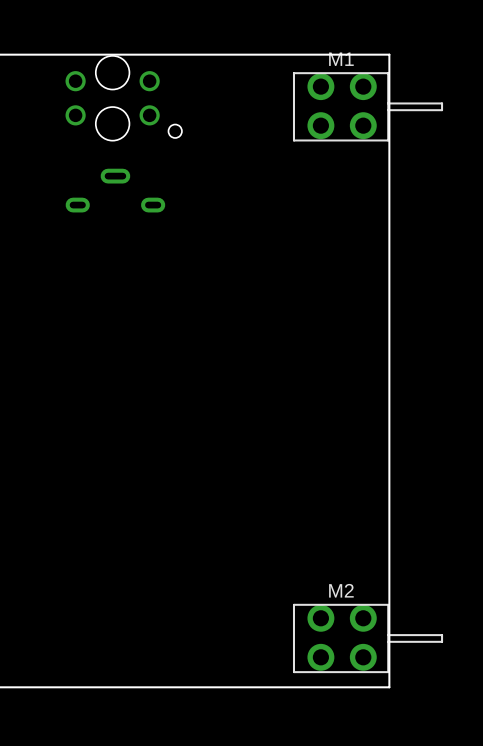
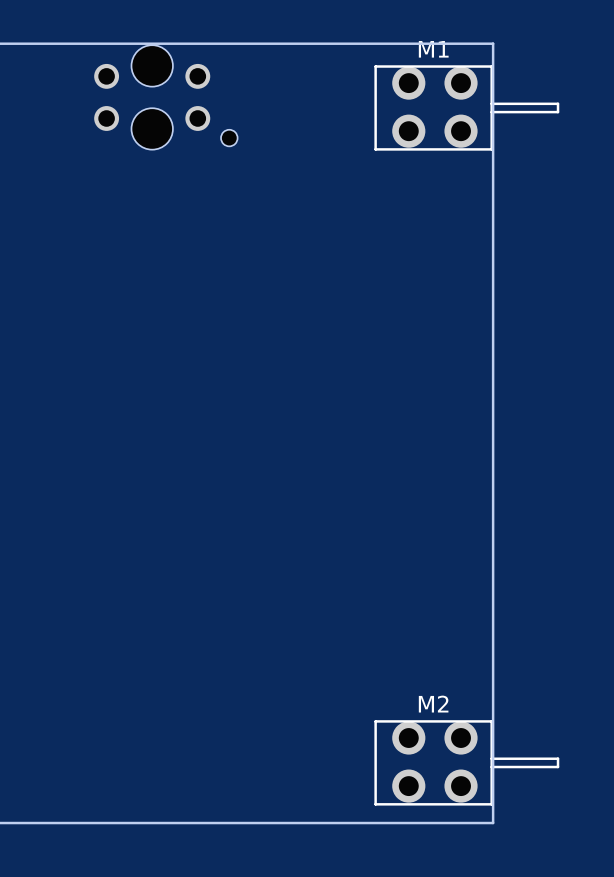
part: (115, 190) -> none

